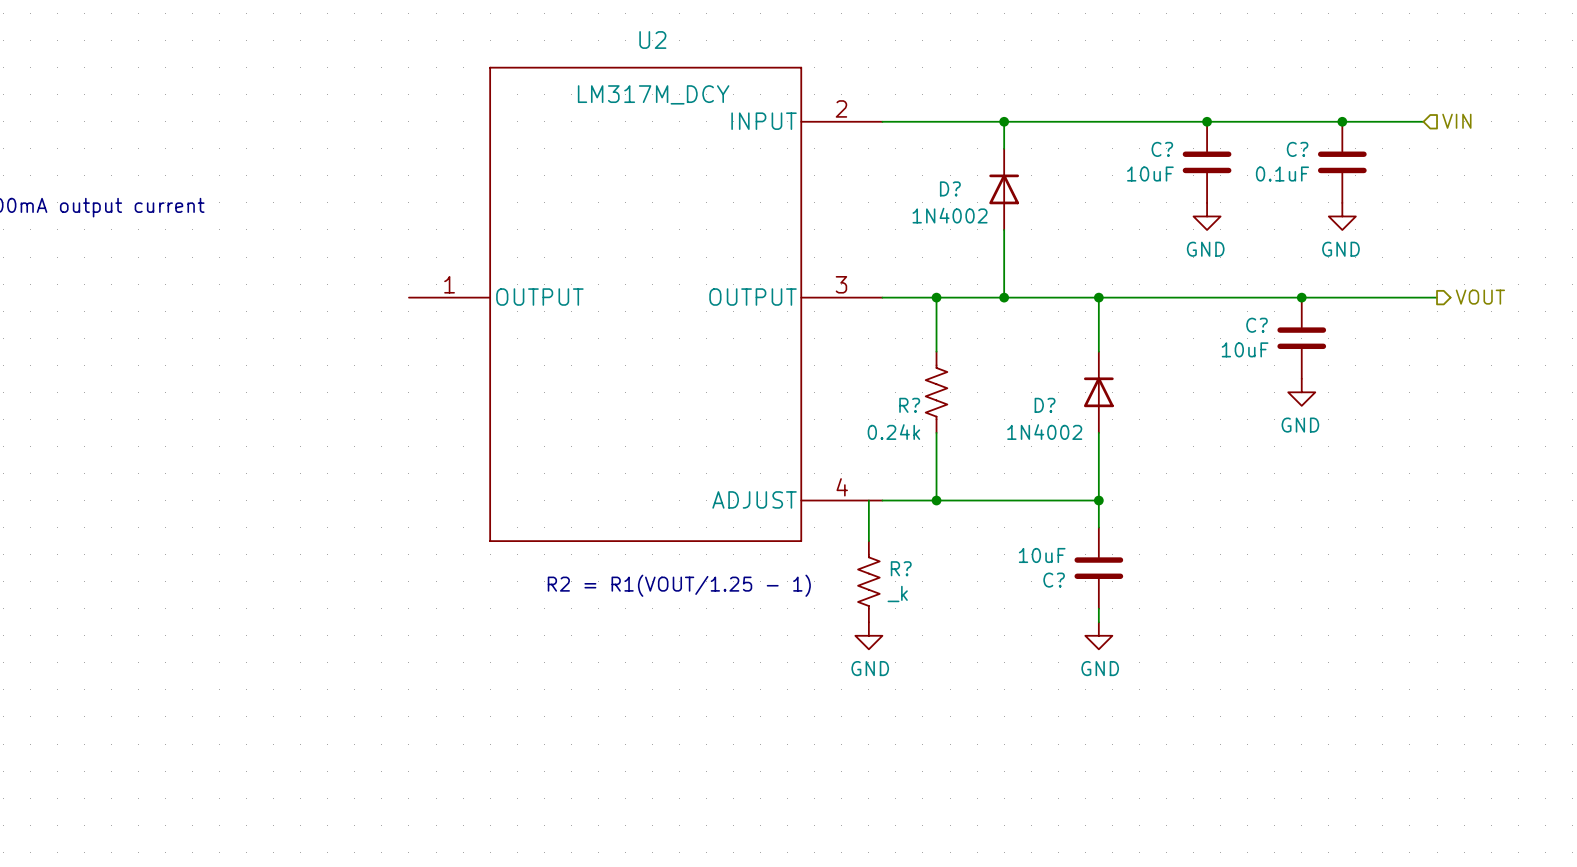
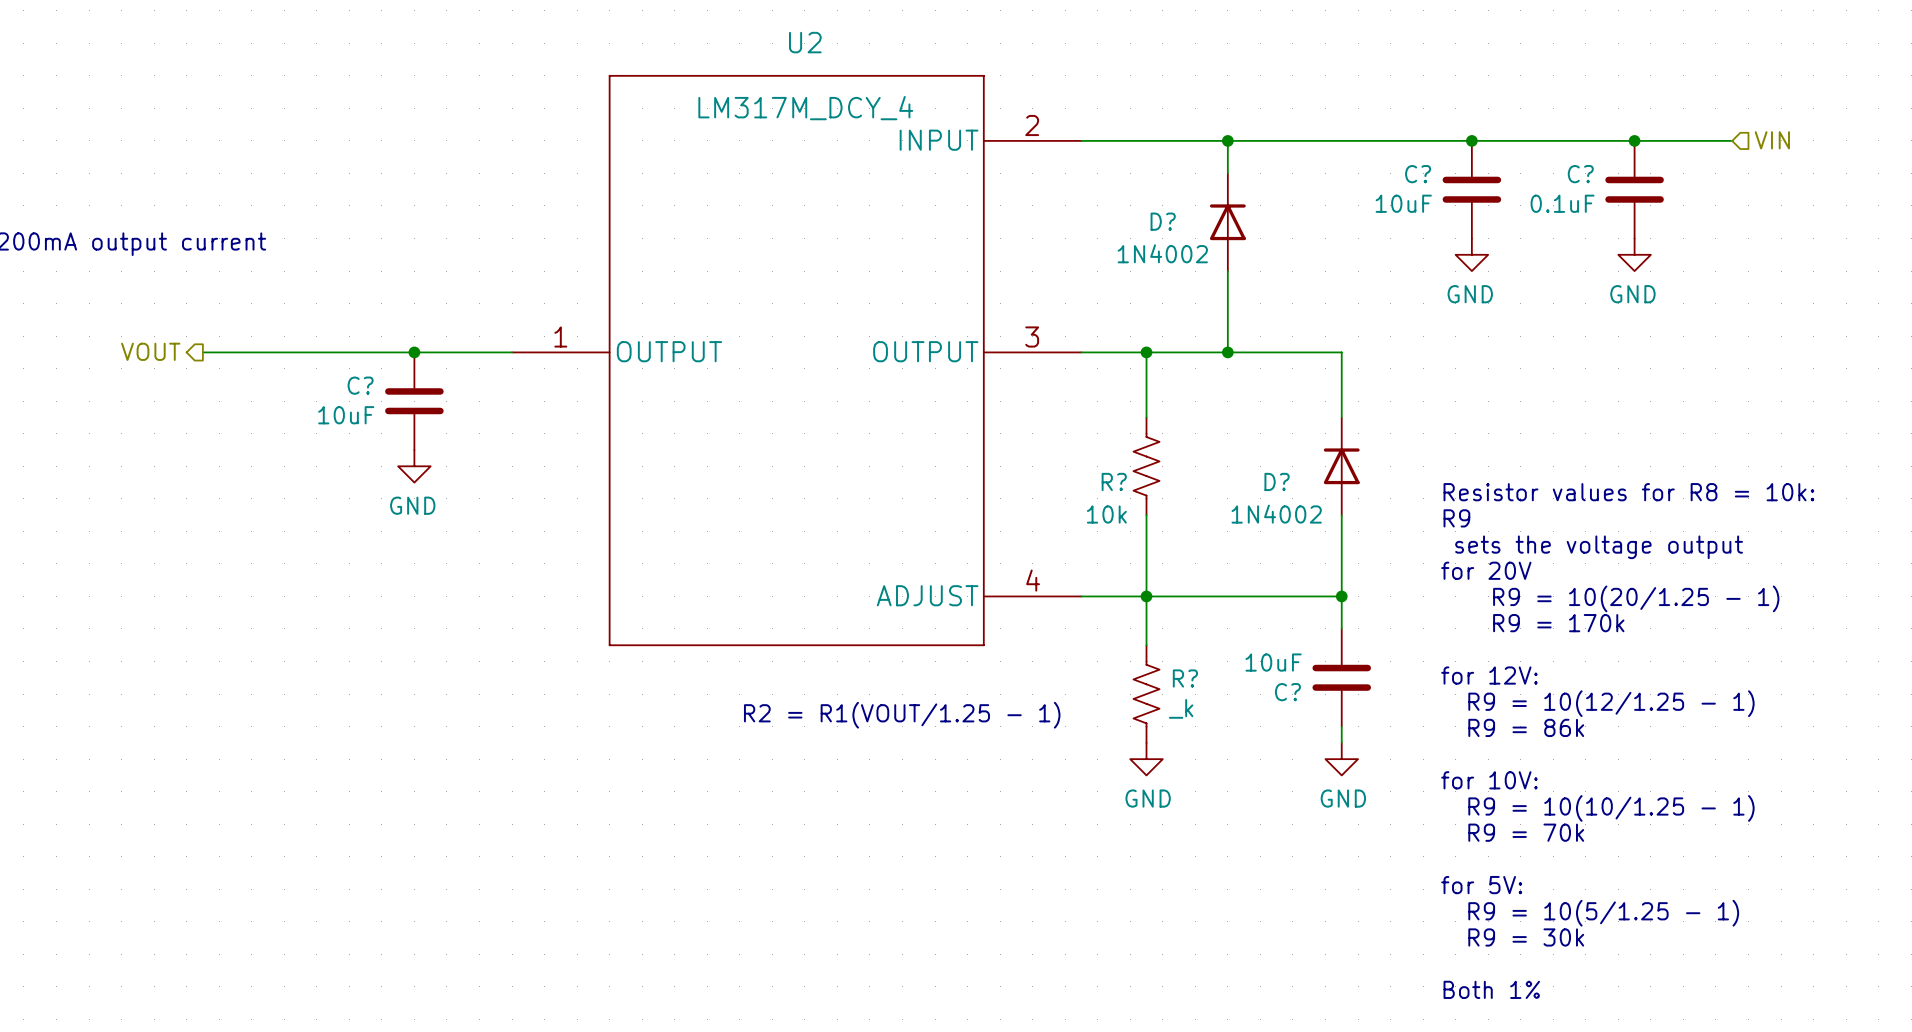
U2 value: LM317M_DCY (653, 94) -> LM317M_DCY_4 (805, 108)
hierarchical label: none -> VOUT (150, 351)
wire: none -> (202, 352) (512, 352)
junction: none -> (414, 352)
wire: (1098, 297) (1437, 297) -> none
junction: (1098, 297) -> none
junction: (1301, 297) -> none
hierarchical label: VOUT (1480, 297) -> none
C?: none -> 10uF (414, 401)
C?: 10uF (1301, 338) -> none
power symbol: none -> GND (414, 466)
power symbol: GND (1301, 392) -> none
text: none -> Resistor values for R8 = 10k: (1628, 492)
R? value: 0.24k (893, 432) -> 10k (1106, 514)
text: none -> R9 (1456, 518)
text: none -> sets the voltage output (1599, 547)
text: none -> for 20V (1486, 570)
wire: (868, 500) (868, 541) -> (1146, 596) (1146, 645)
text: none -> R9 = 10(20/1.25 - 1) (1636, 598)
text: none -> R9 = 170k (1558, 623)
text: none -> for 12V: (1489, 675)
R? position: (868, 581) -> (1146, 694)
text position: R2 = R1(VOUT/1.25 - 1) (679, 585) -> R2 = R1(VOUT/1.25 - 1) (902, 715)
text: none -> R9 = 10(12/1.25 - 1) (1611, 703)
text: none -> R9 = 86k (1526, 727)
power symbol position: GND (868, 635) -> GND (1146, 759)
text: none -> for 10V: (1489, 780)
text: none -> R9 = 10(10/1.25 - 1) (1611, 808)
text: none -> R9 = 70k (1526, 832)
text: none -> for 5V: (1481, 885)
text: none -> R9 = 10(5/1.25 - 1) (1603, 913)
text: none -> R9 = 30k (1526, 937)
text: none -> Both 1% (1491, 989)

